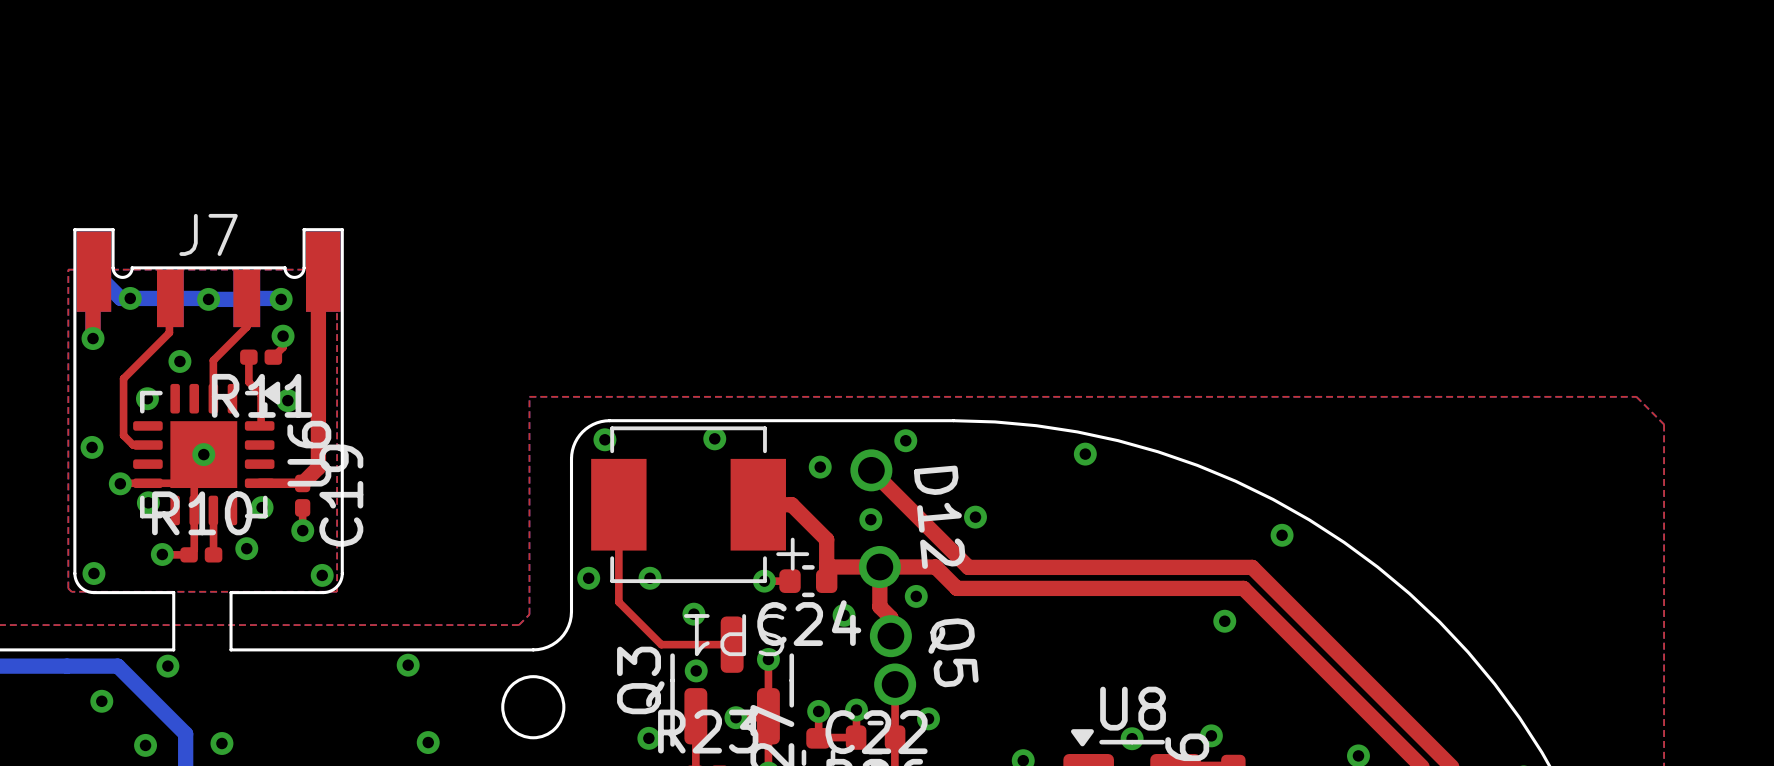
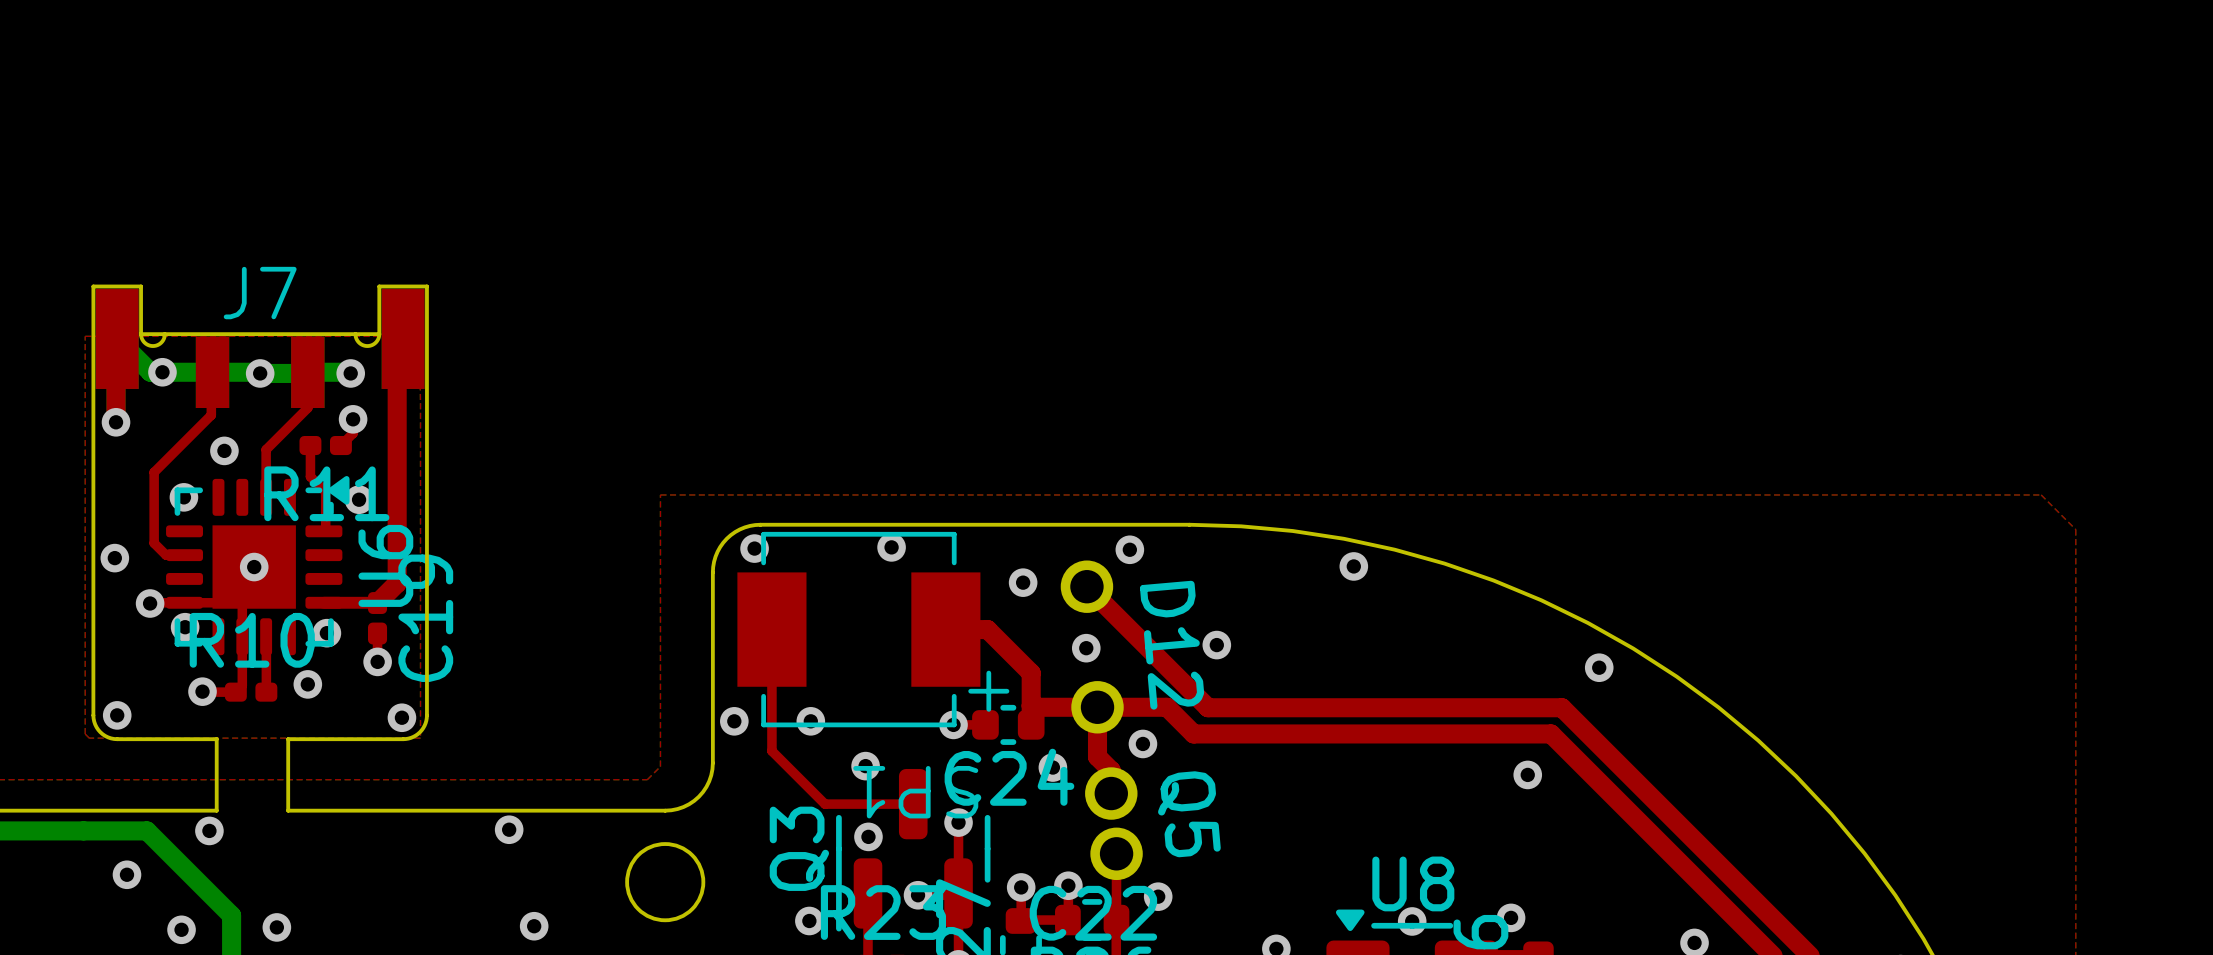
board edge: none -> (141, 334) (164, 334)
board edge: none -> (355, 334) (379, 334)

